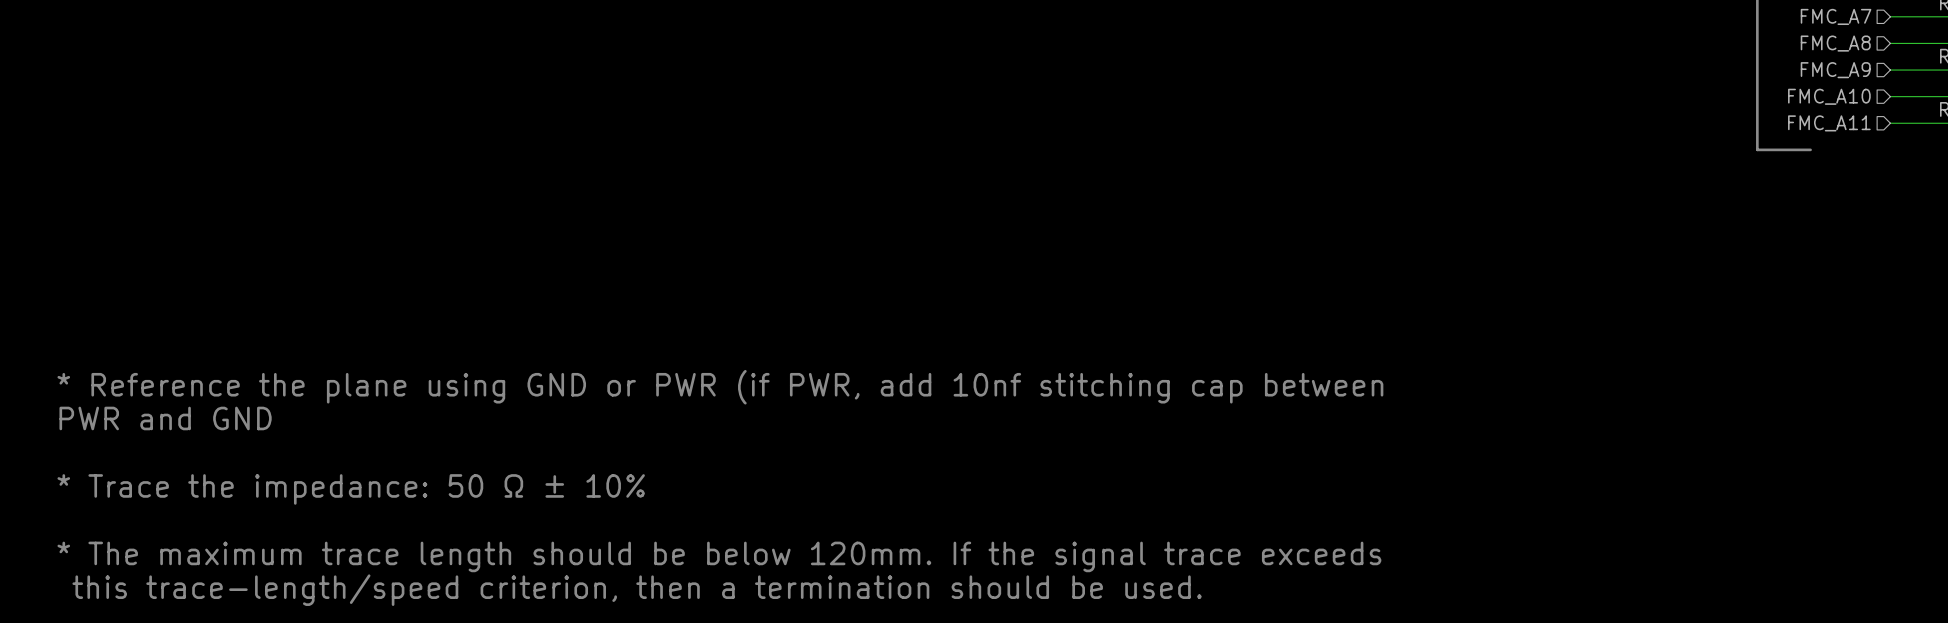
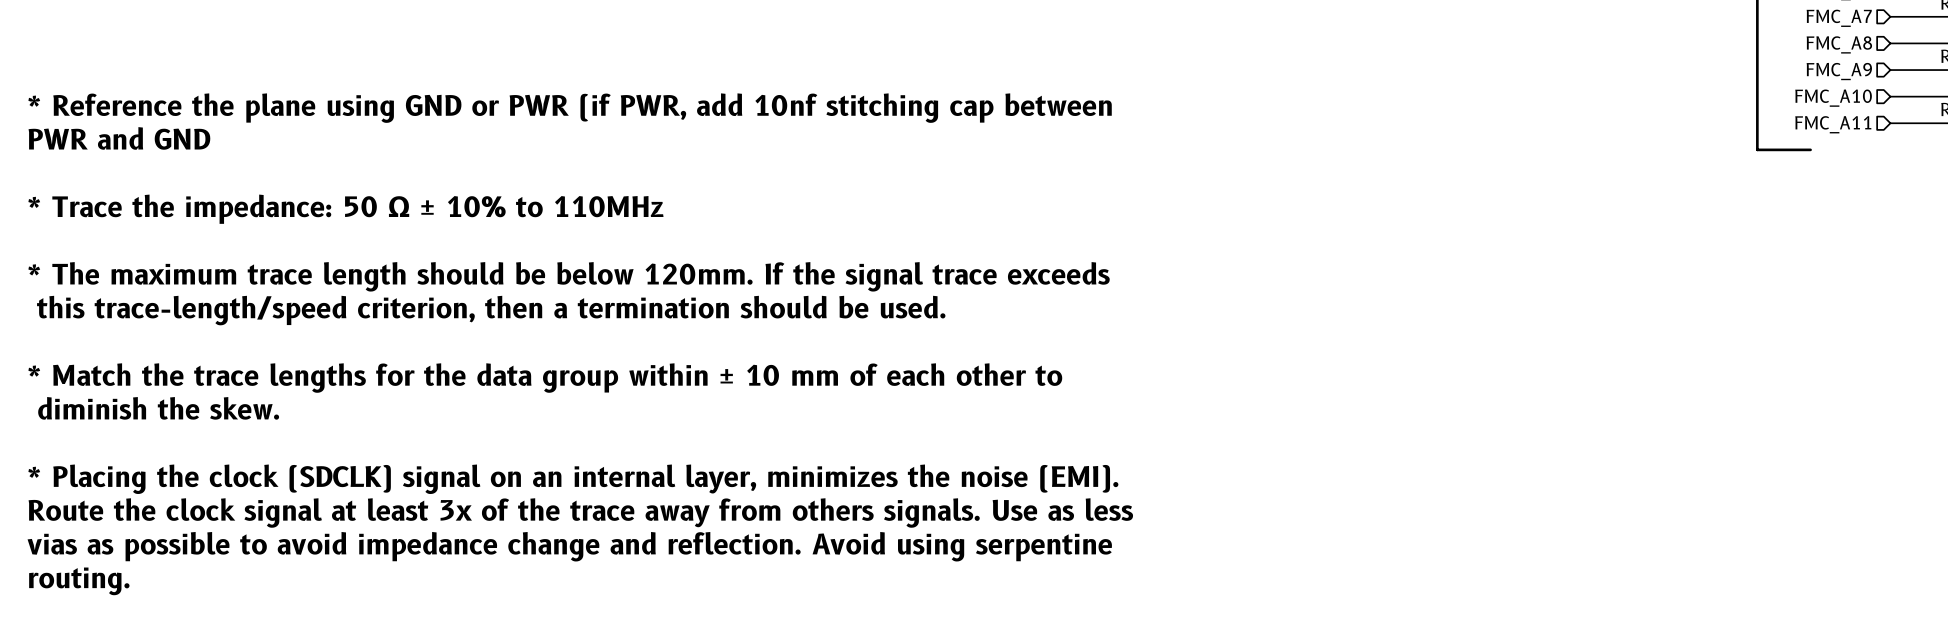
text: none -> * Reference the plane using GND or PWR (if PWR, add 10nf stitching cap between (570, 108)
text: none -> PWR and GND (119, 138)
text: none -> * Trace the impedance: 50 Ω ± 10% to 110MHz (345, 209)
text: none -> * The maximum trace length should be below 120mm. If the signal trace exceeds (569, 276)
text: none -> this trace-length/speed criterion, then a termination should be used. (491, 310)
text: none -> * Match the trace lengths for the data group within ± 10 mm of each other to (545, 378)
text: * Reference the plane using GND or PWR (if PWR, add 10nf stitching cap between (720, 387) -> none
text: none -> diminish the skew. (158, 408)
text: PWR and GND (165, 418) -> none
text: none -> * Placing the clock (SDCLK) signal on an internal layer, minimizes the noise (EMI). (573, 479)
text: * Trace the impedance: 50 Ω ± 10% (351, 489) -> none
text: none -> Route the clock signal at least 3x of the trace away from others signals. Use as less (580, 512)
text: none -> vias as possible to avoid impedance change and reflection. Avoid using serpentine (569, 546)
text: * The maximum trace length should be below 120mm. If the signal trace exceeds (719, 556) -> none
text: none -> routing. (79, 581)
text: this trace-length/speed criterion, then a termination should be used. (637, 590) -> none

